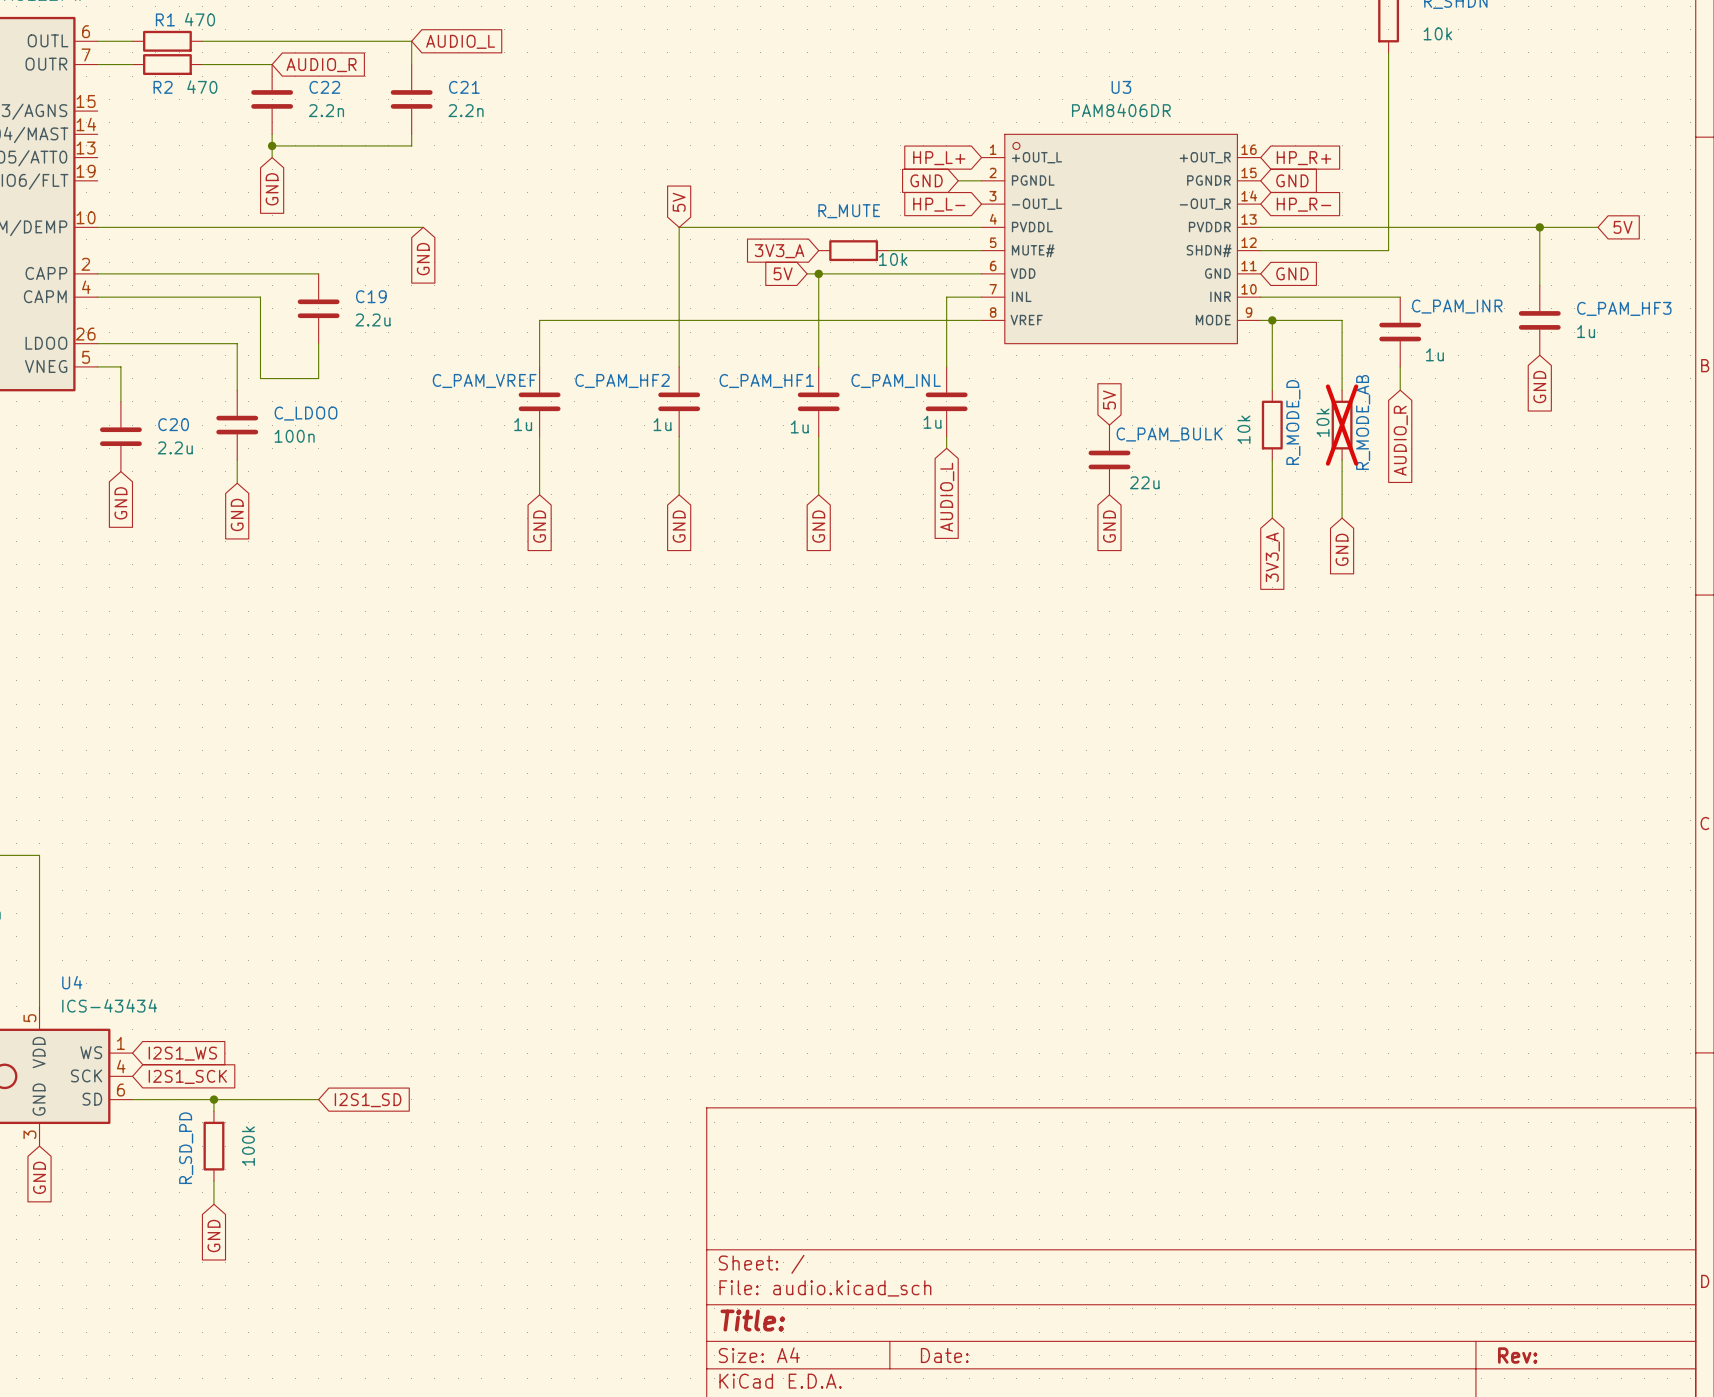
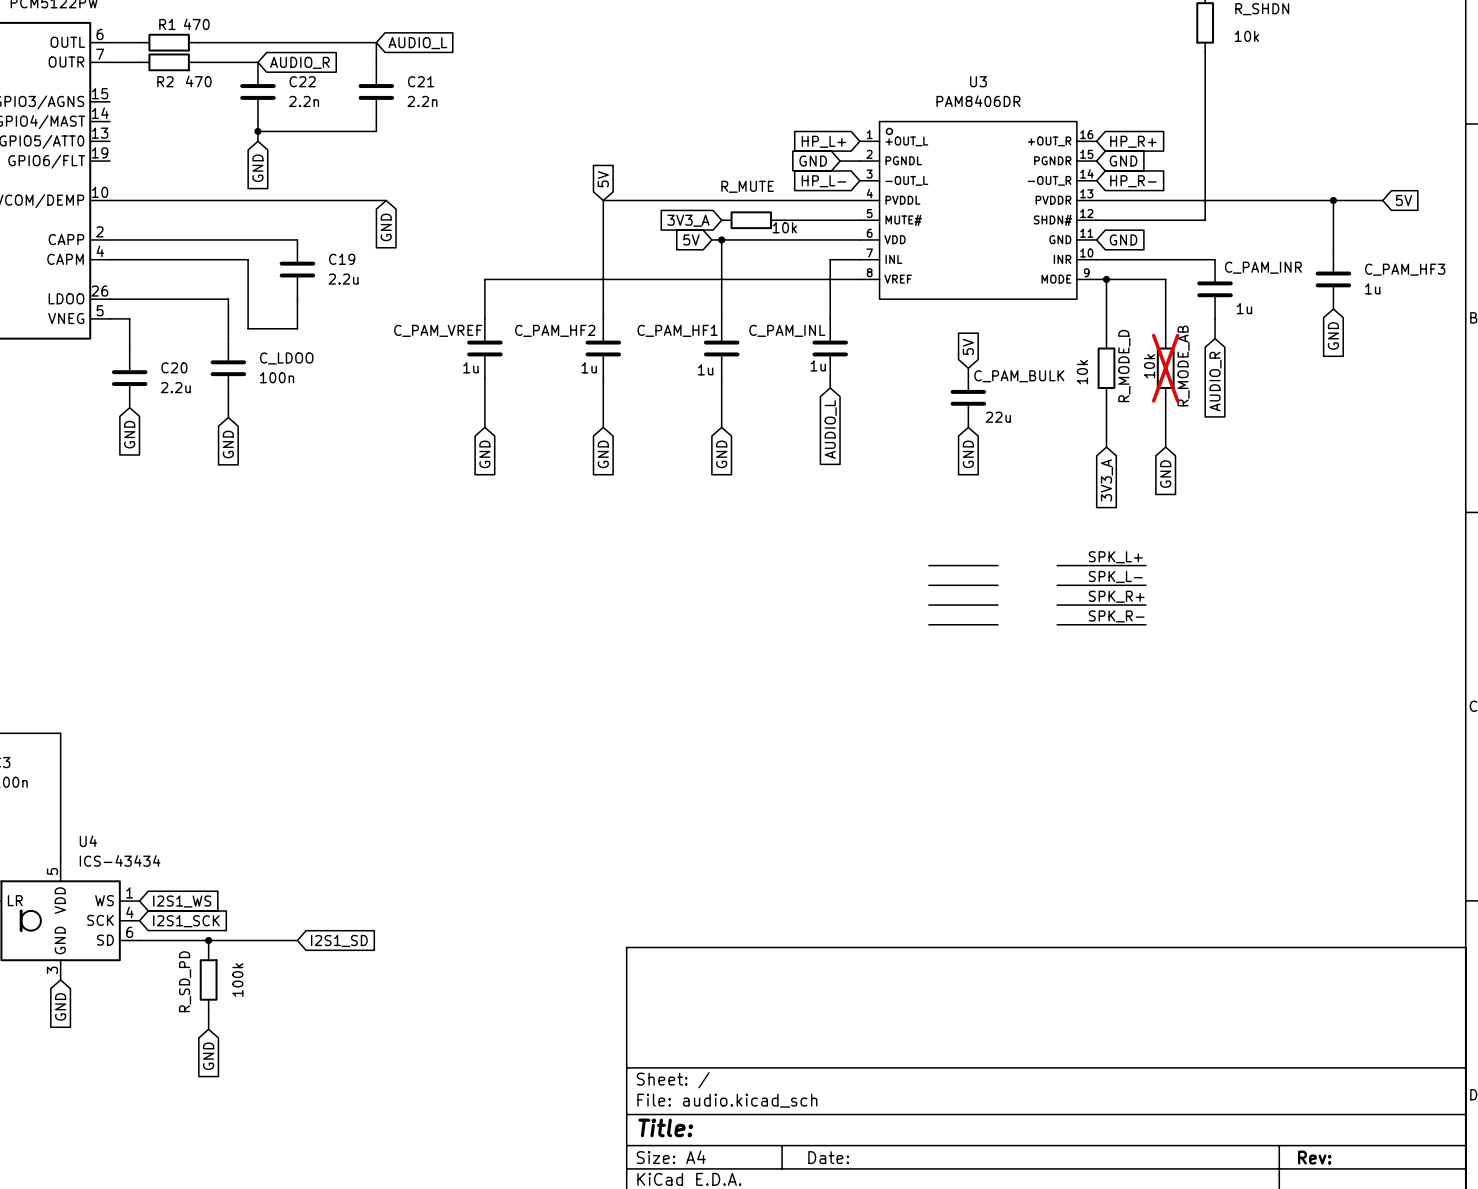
label: none -> SPK_L+ (1115, 557)
wire: none -> (928, 565) (997, 565)
wire: none -> (1057, 565) (1145, 565)
label: none -> SPK_L- (1115, 576)
wire: none -> (928, 585) (997, 585)
wire: none -> (1057, 585) (1145, 585)
label: none -> SPK_R+ (1116, 596)
wire: none -> (928, 605) (997, 605)
wire: none -> (1057, 605) (1145, 605)
label: none -> SPK_R- (1116, 616)
wire: none -> (928, 624) (997, 624)
wire: none -> (1057, 624) (1145, 624)

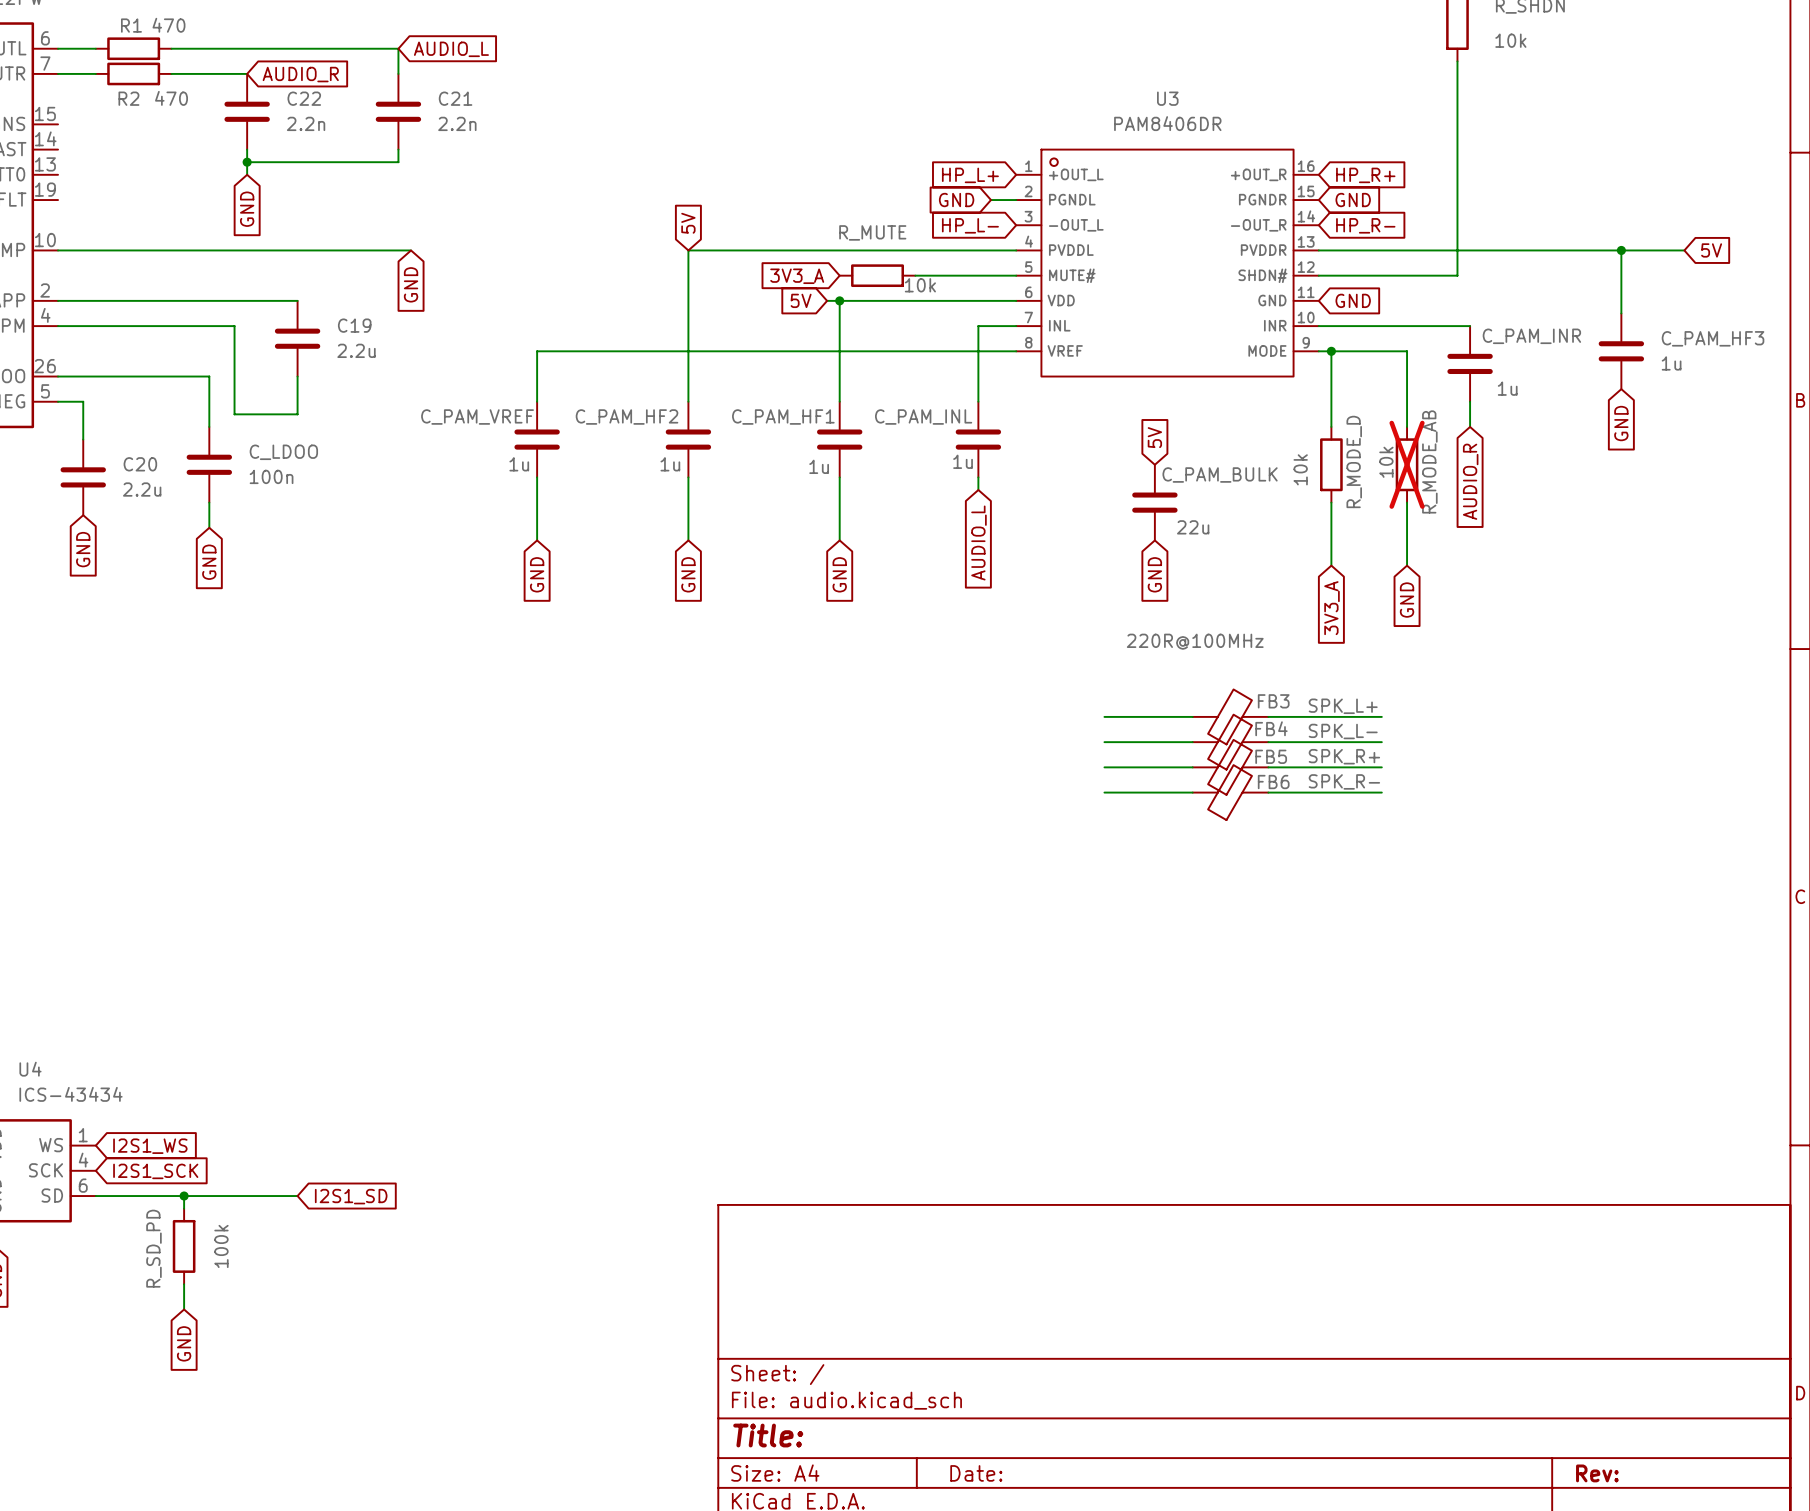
FB3: none -> 220R@100MHz (1230, 716)
FB4: none -> (1230, 742)
FB5: none -> (1230, 767)
FB6: none -> (1230, 792)

